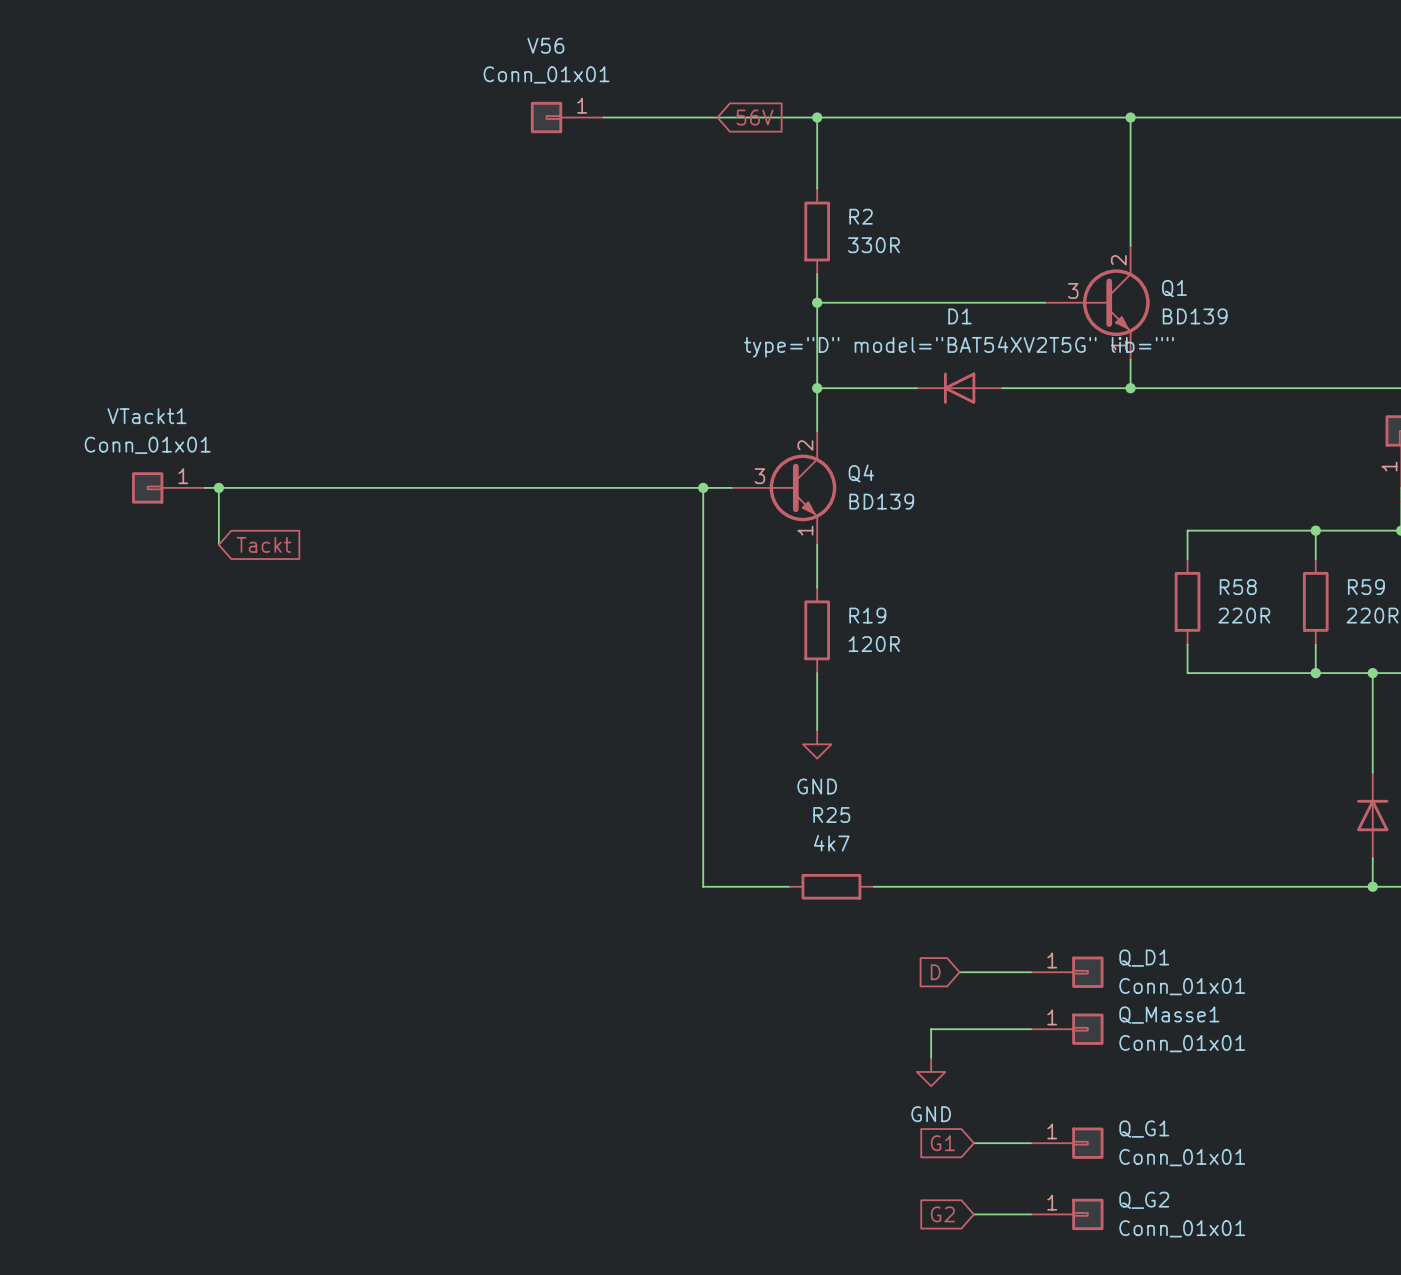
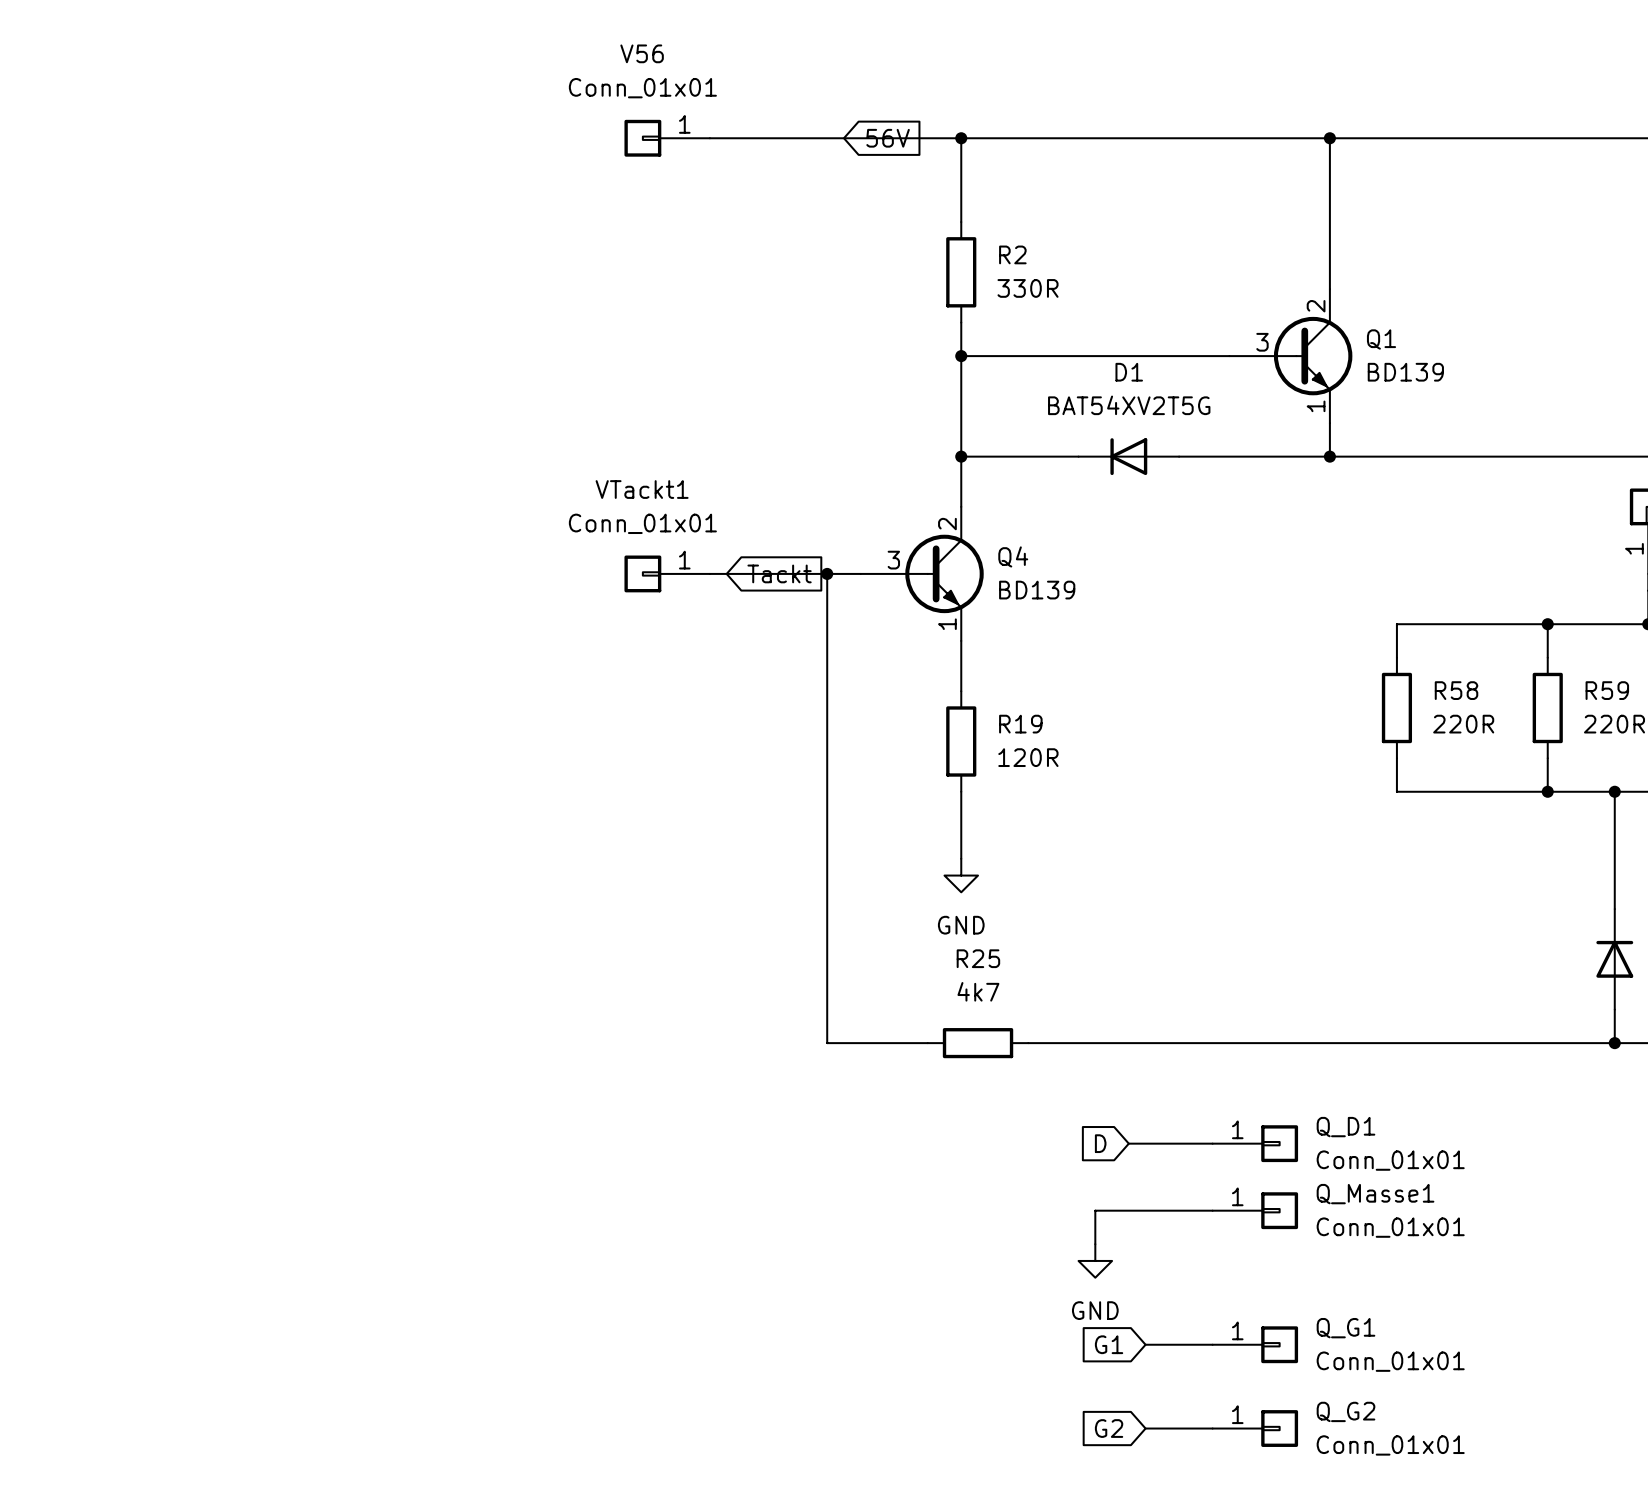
D1 value: type="D" model="BAT54XV2T5G" lib="" (958, 346) -> BAT54XV2T5G (1129, 405)
VTackt1 position: (168, 487) -> (667, 573)
wire: (204, 487) (603, 487) -> none
wire: (218, 487) (218, 544) -> none
junction: (218, 487) -> none
global label: none -> Tackt (779, 573)
global label: Tackt (263, 544) -> none

